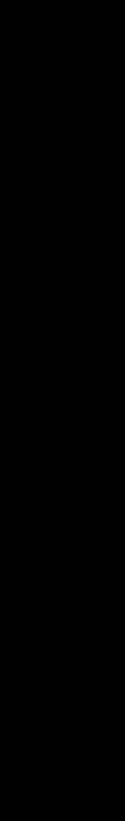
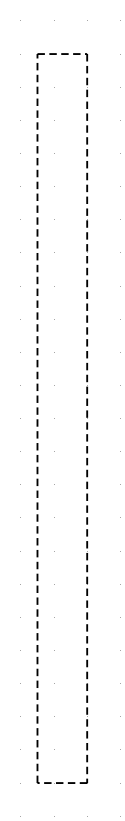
line: none -> (37, 54) (37, 783) (87, 783) (87, 54) (37, 54)

